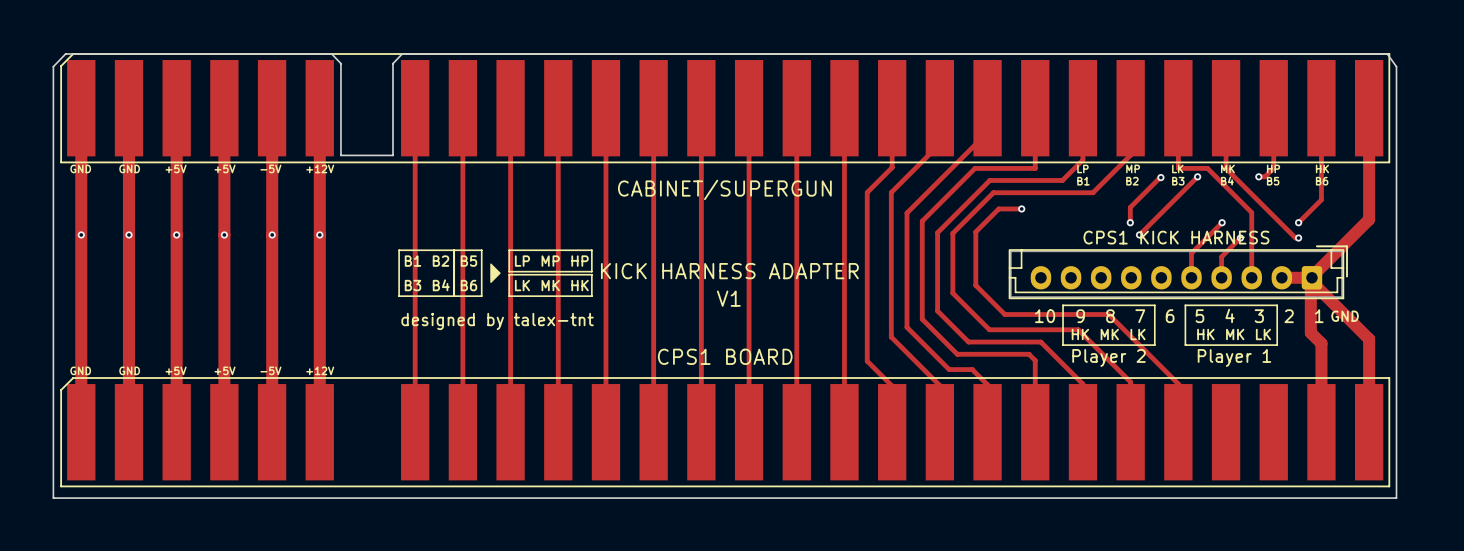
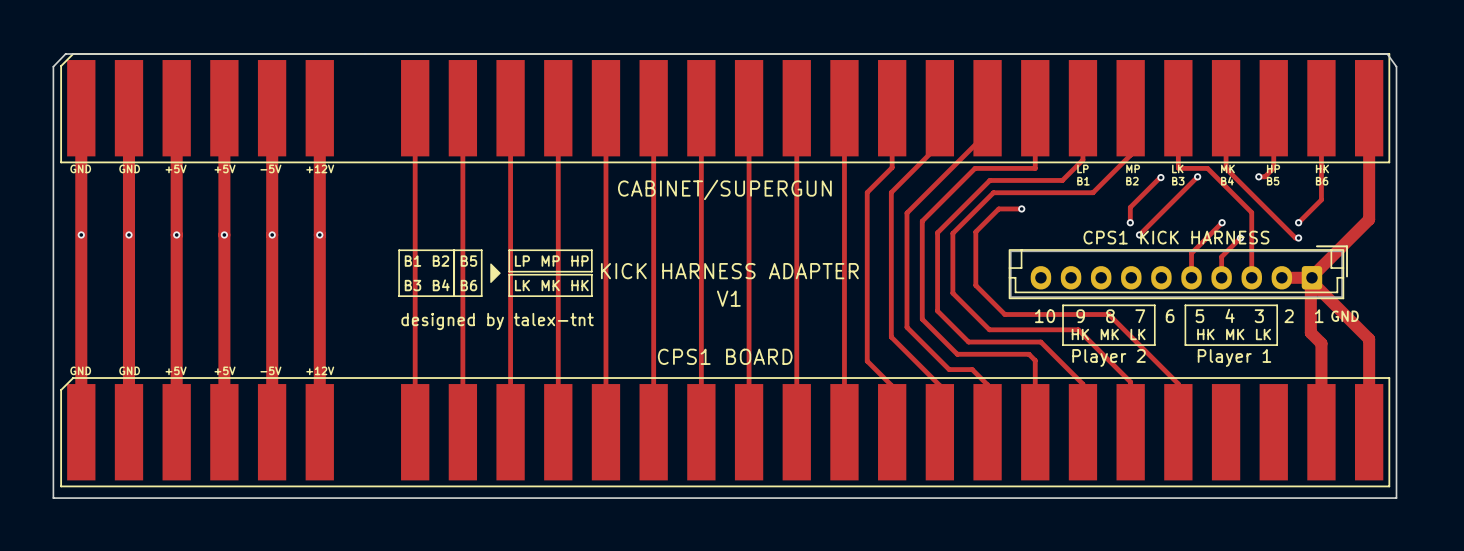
board edge: (331, 53) (340, 63) (340, 155) (392, 155) (392, 63) (402, 53) -> (331, 53) (402, 53)

